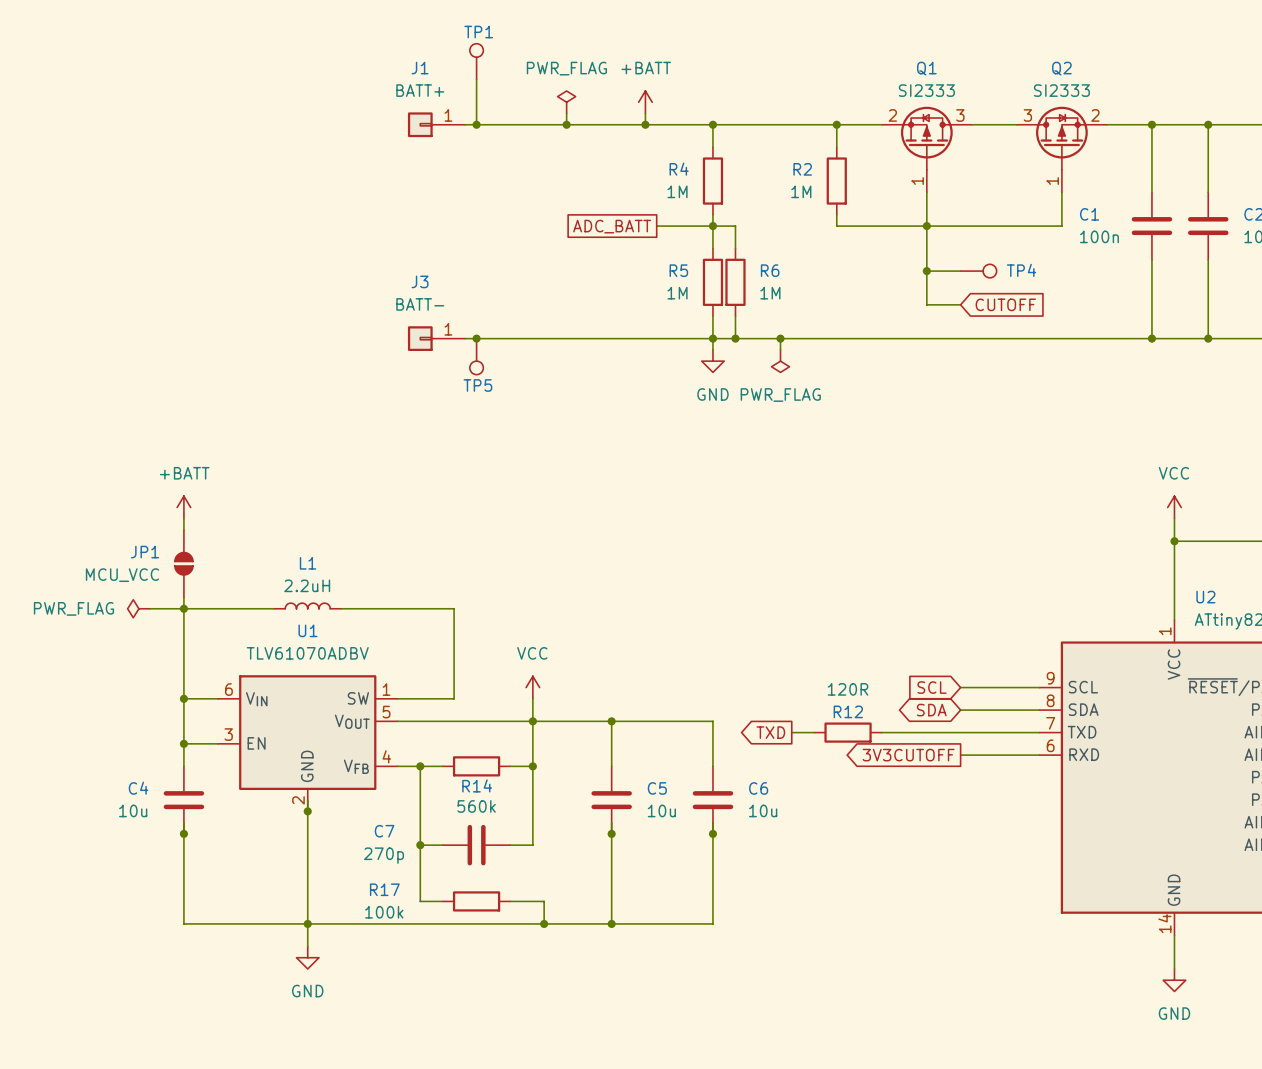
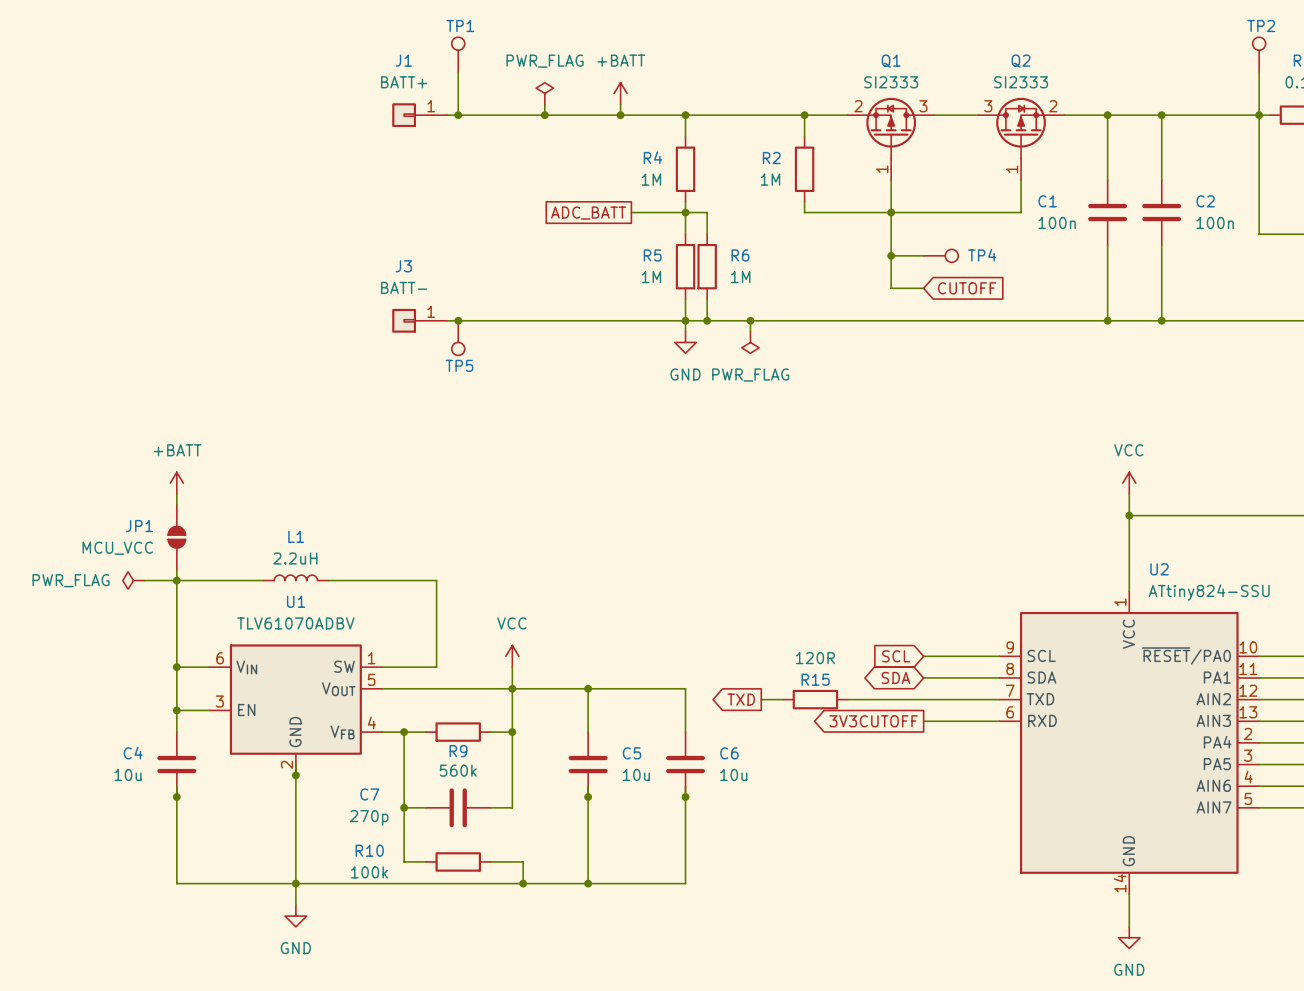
R12 name: R12 (848, 711) -> R15 (815, 679)
R14 name: R14 (477, 785) -> R9 (458, 751)
R17 name: R17 (384, 889) -> R10 (369, 850)

